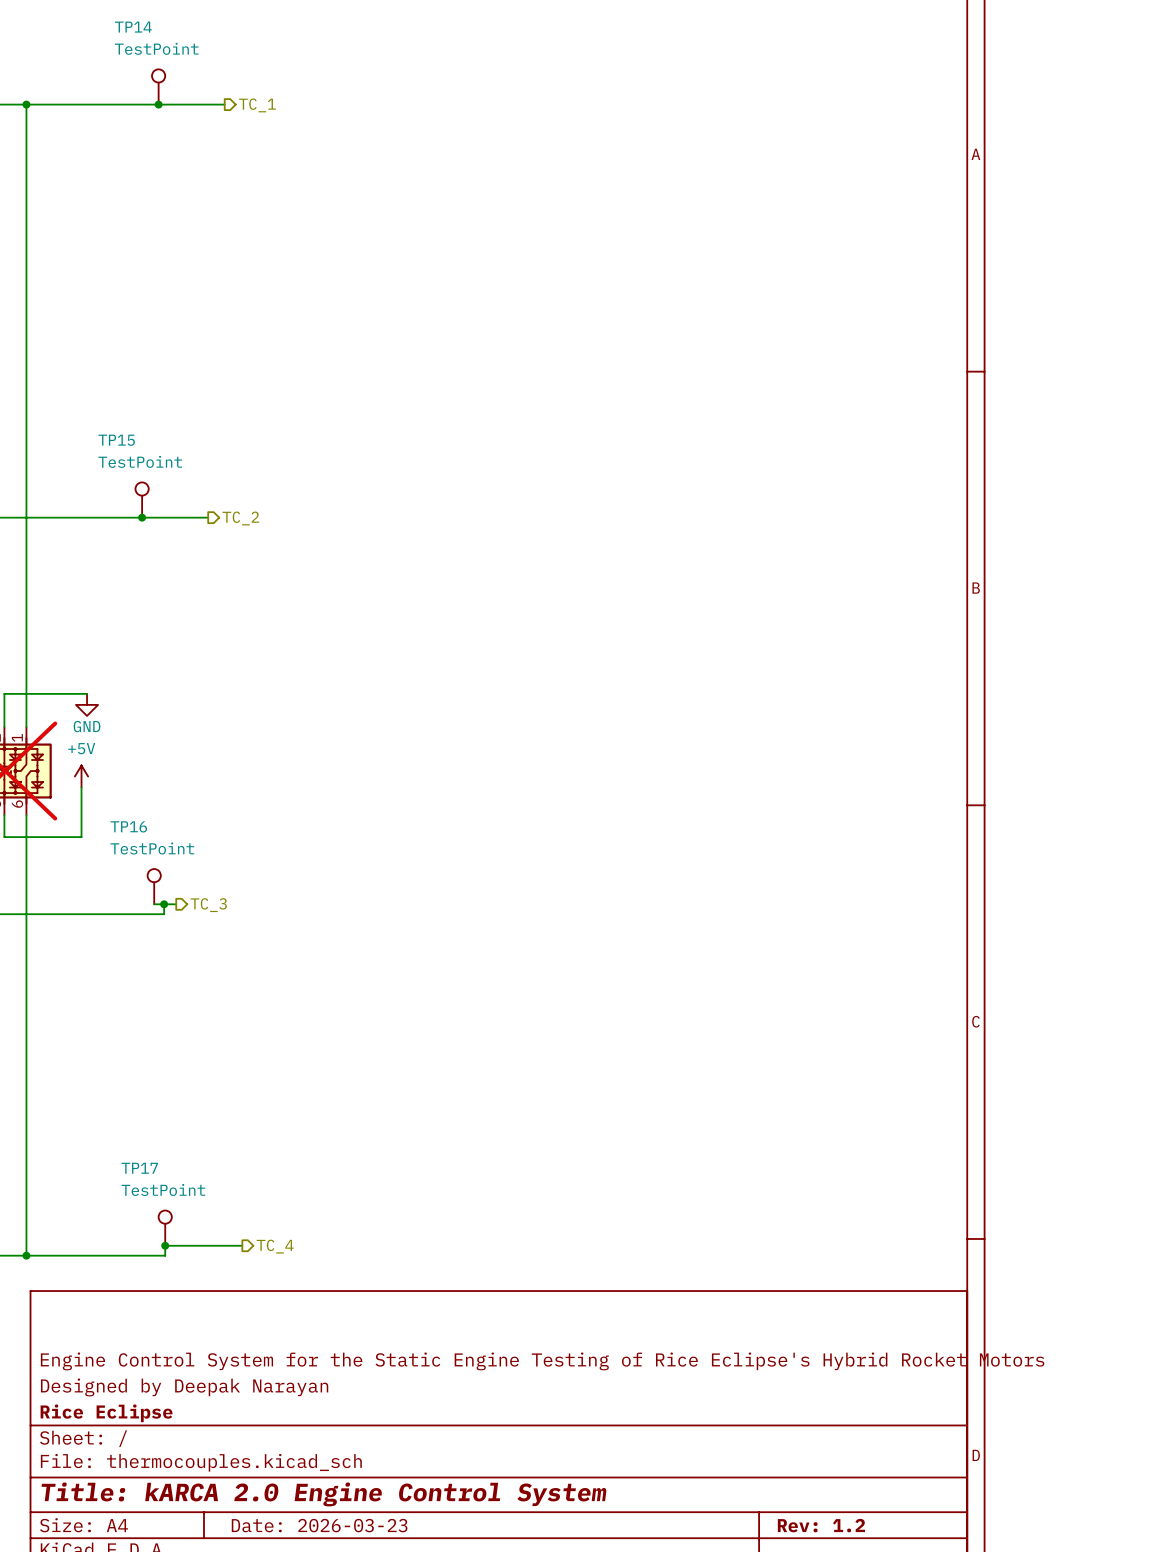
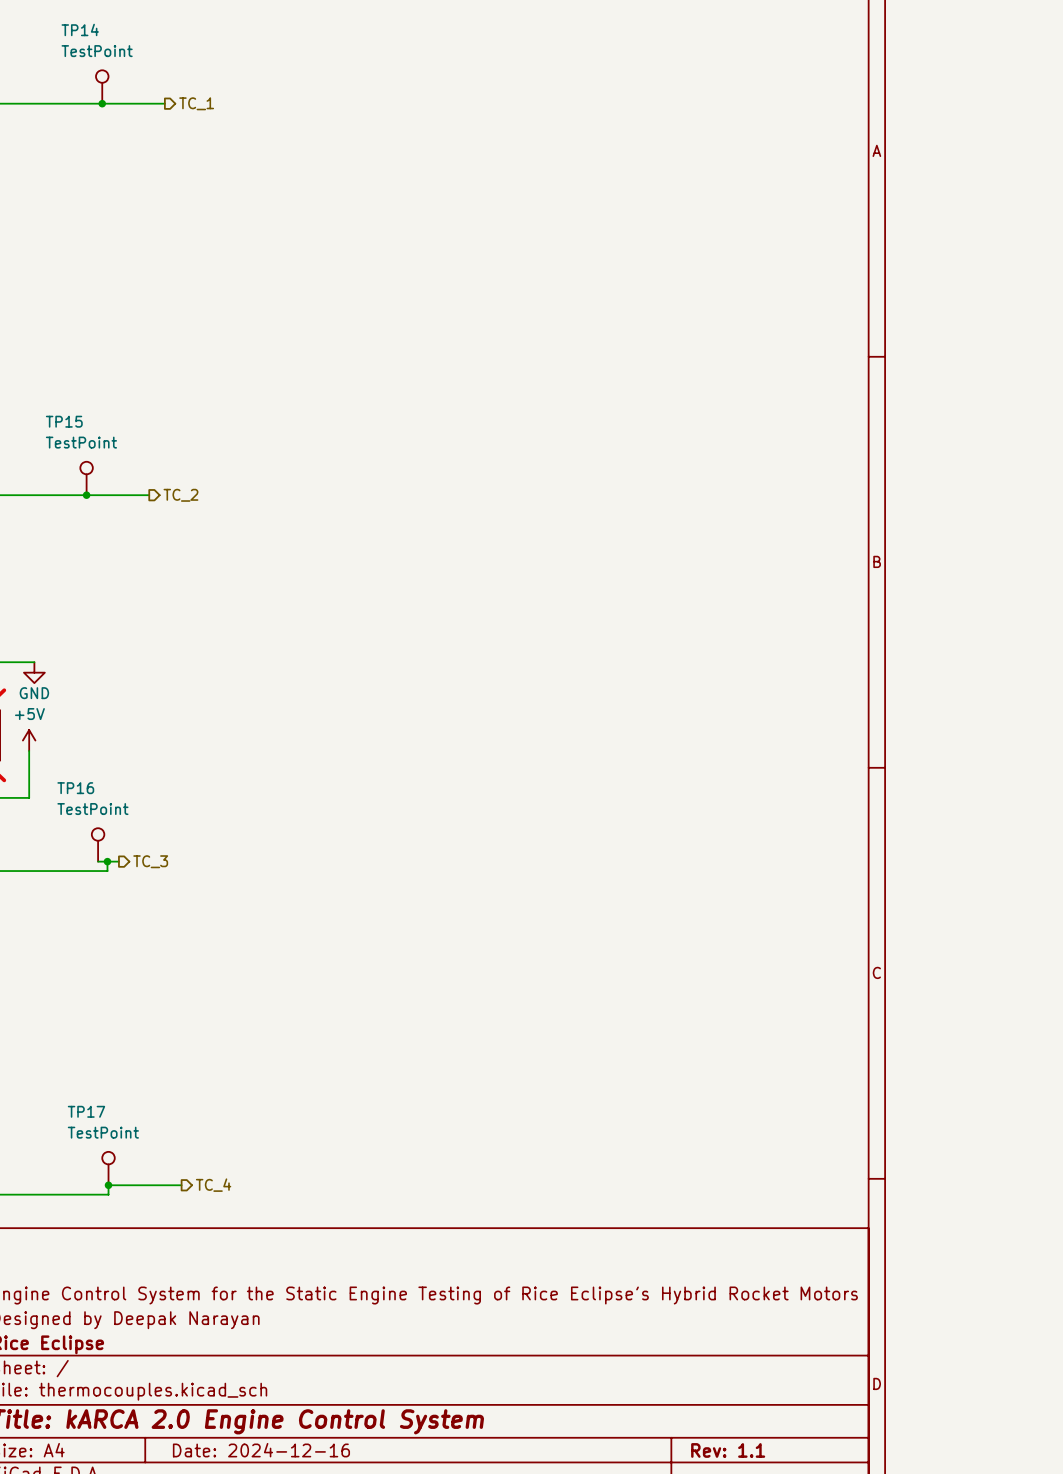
title block: Date: 2026-03-23 (319, 1525) -> Date: 2024-12-16 (261, 1450)
title block: Rev: 1.2 (821, 1525) -> Rev: 1.1 (728, 1450)

